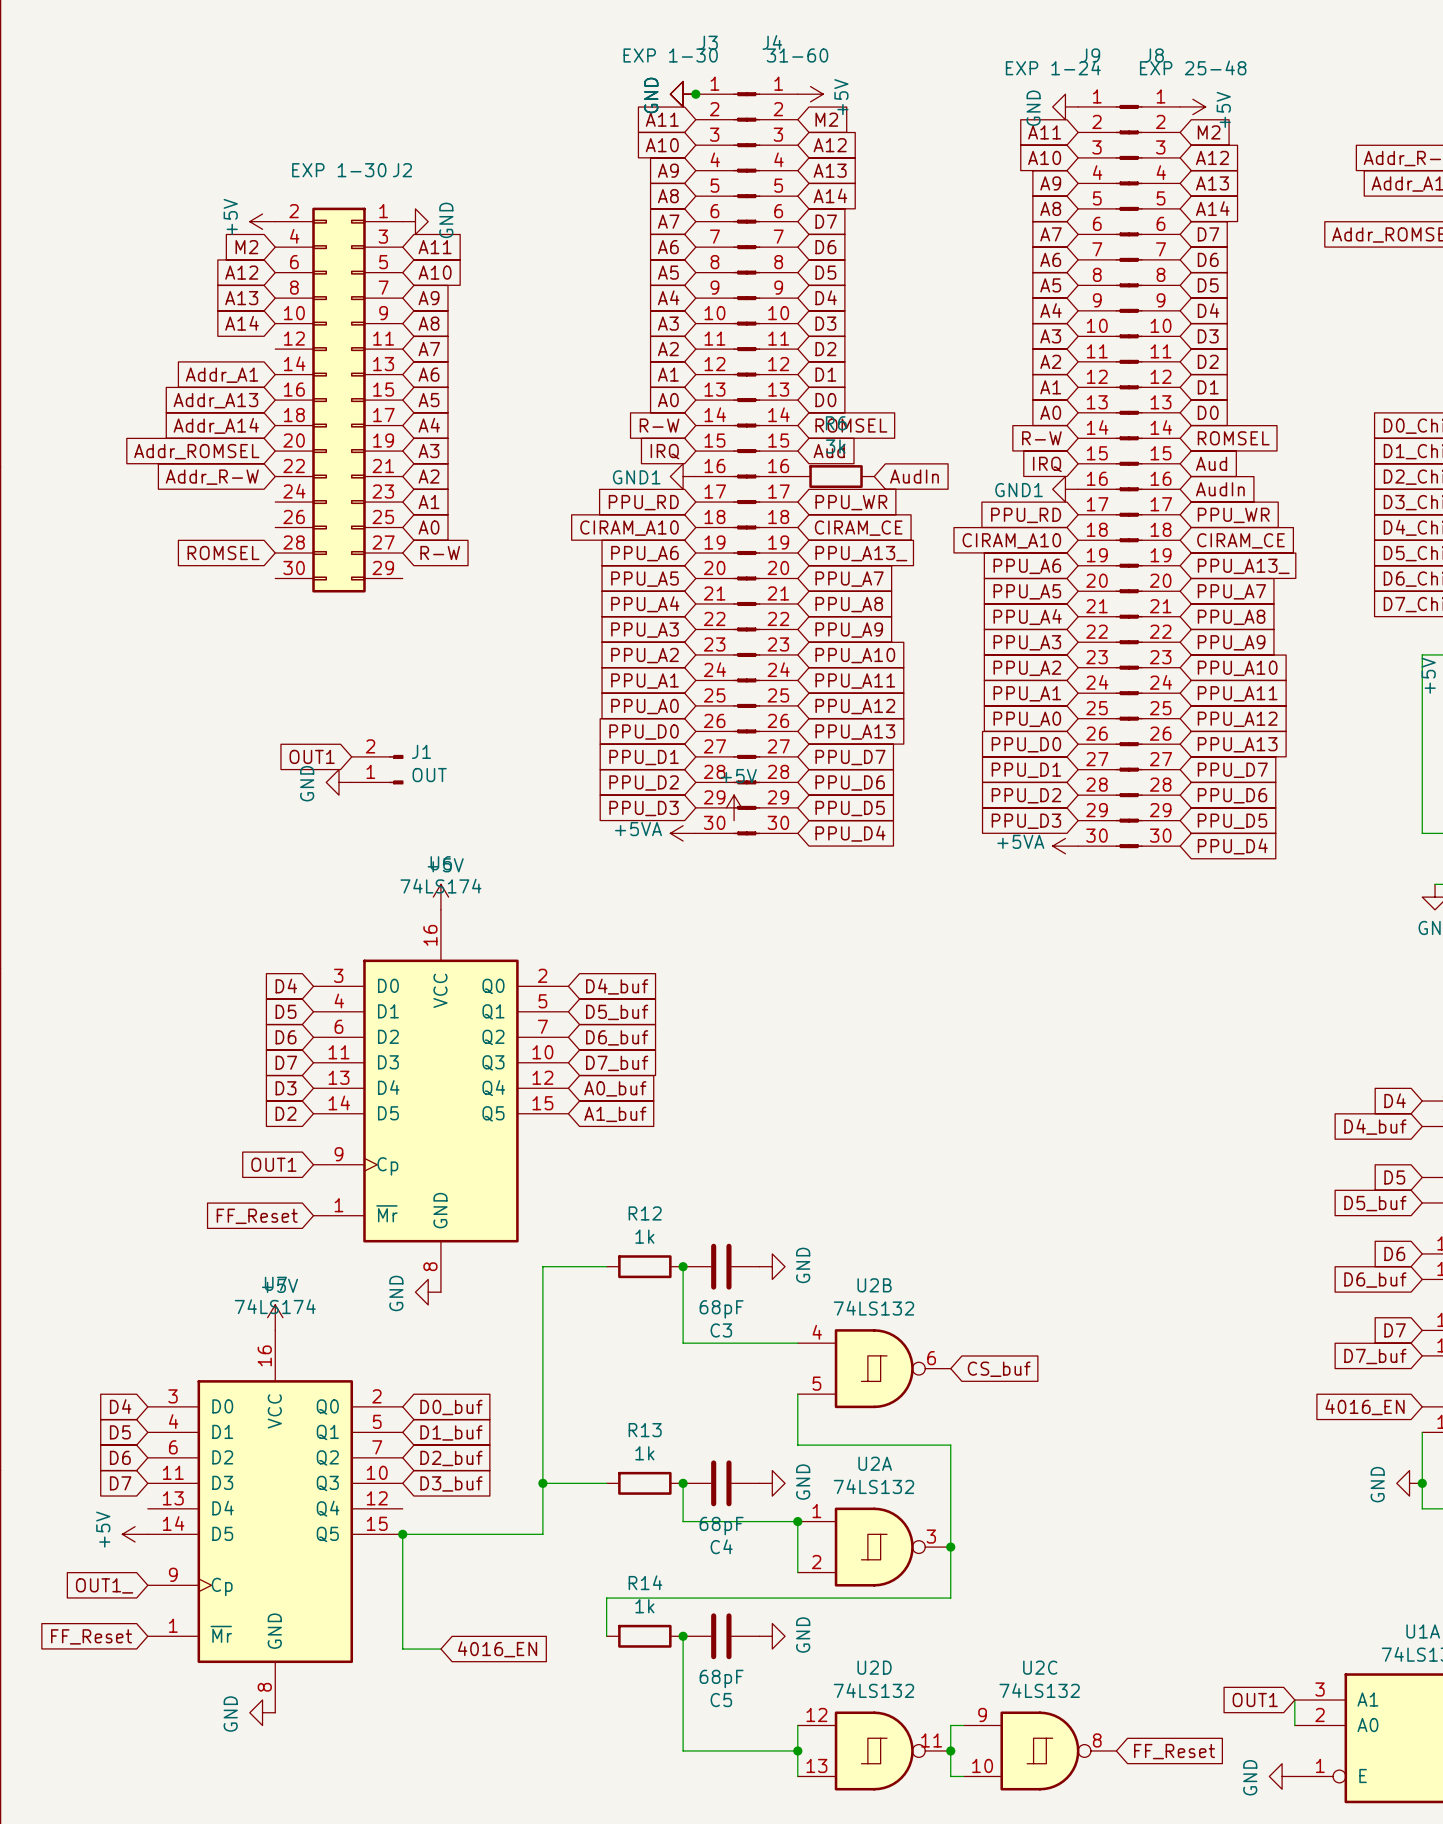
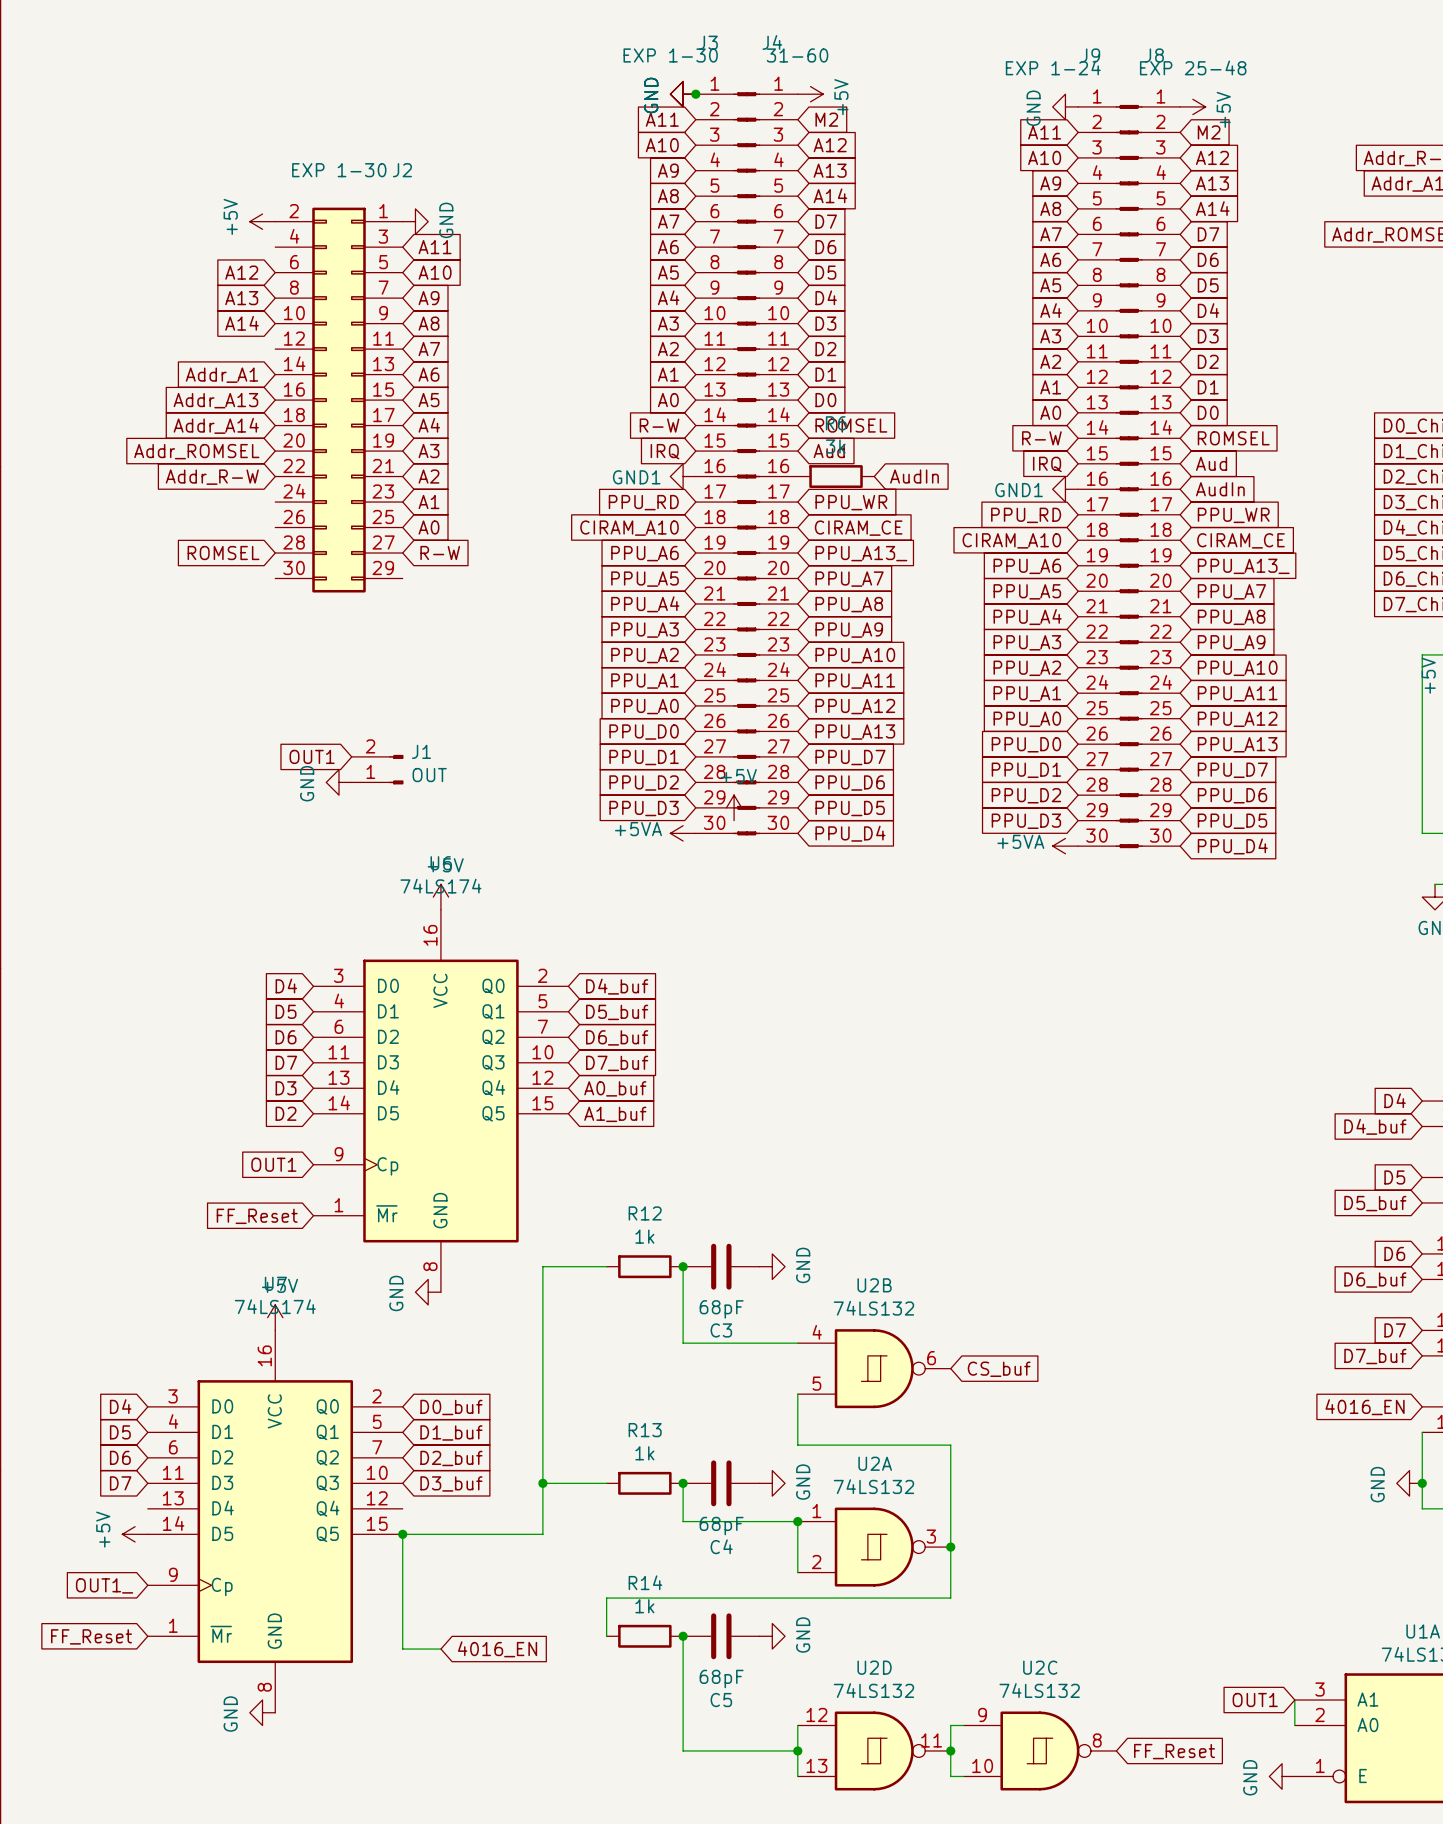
global label: M2 (246, 247) -> none

